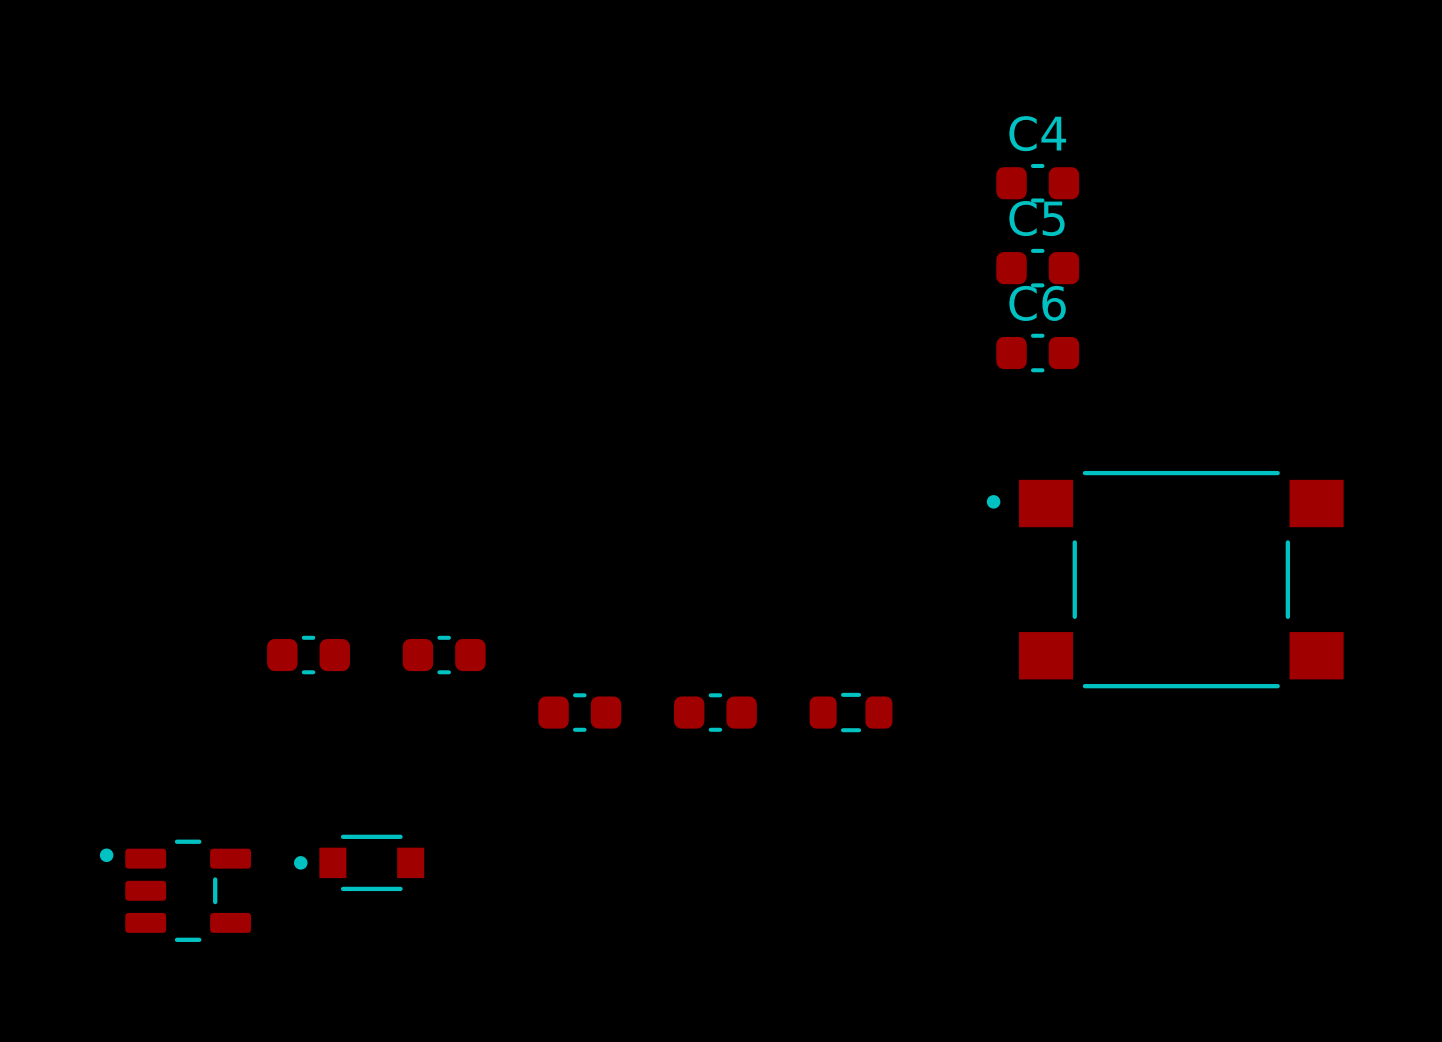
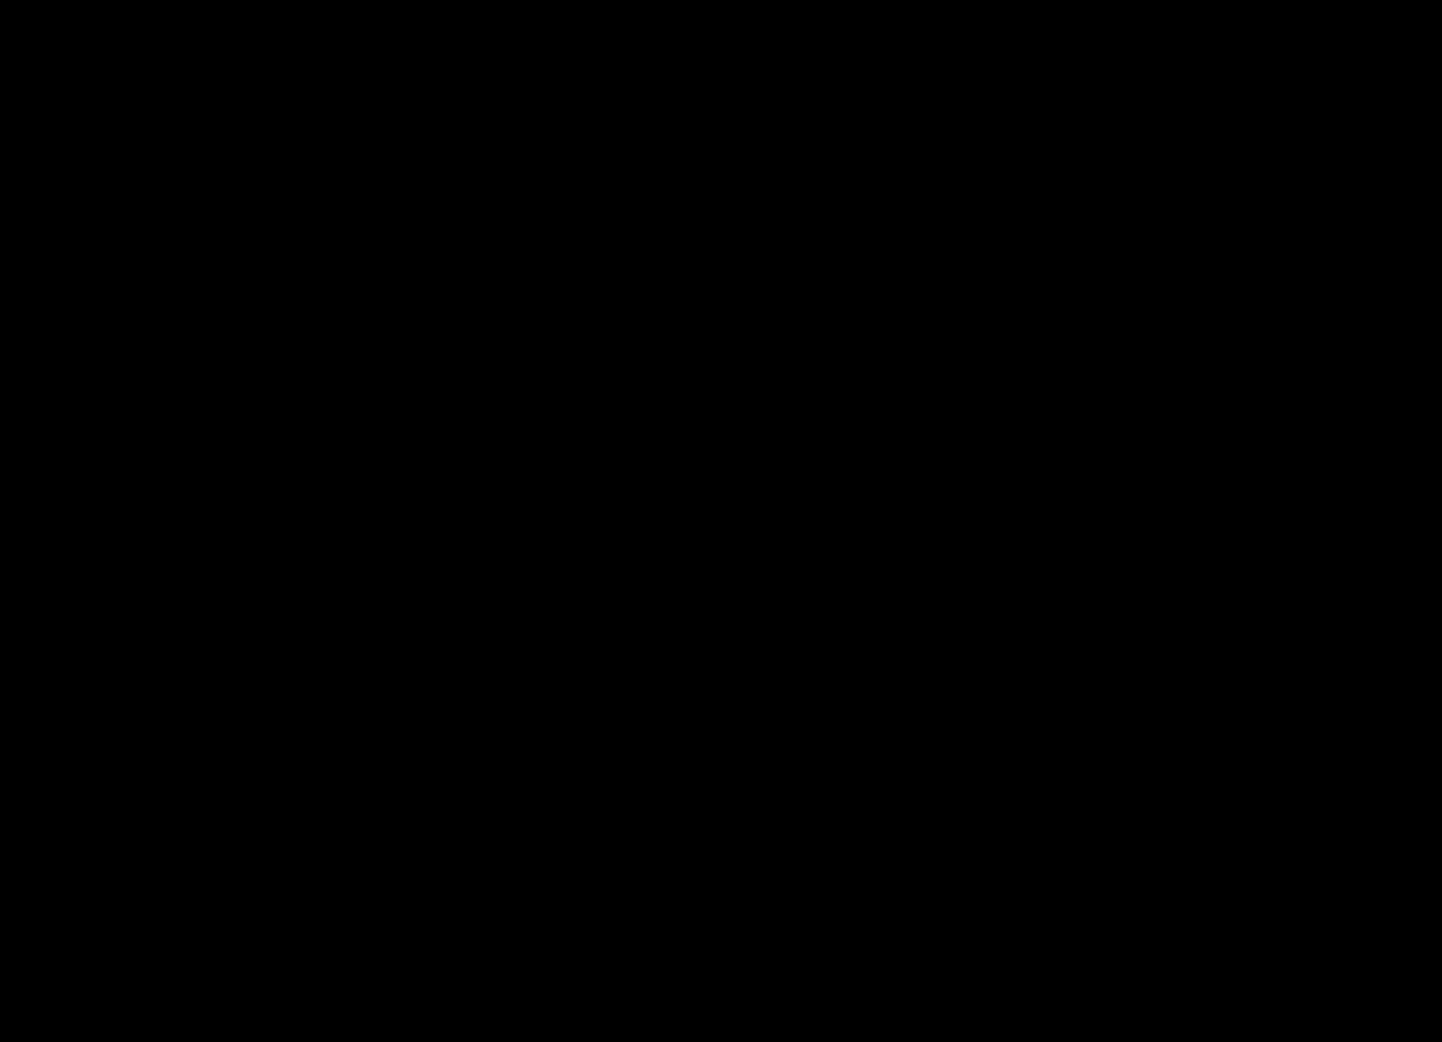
C4: (1037, 183) -> none
C5: (1037, 268) -> none
C6: (1037, 353) -> none
part: (1165, 579) -> none
part: (308, 655) -> none
part: (444, 655) -> none
part: (579, 712) -> none
part: (715, 712) -> none
part: (851, 712) -> none
part: (359, 862) -> none
part: (175, 890) -> none

